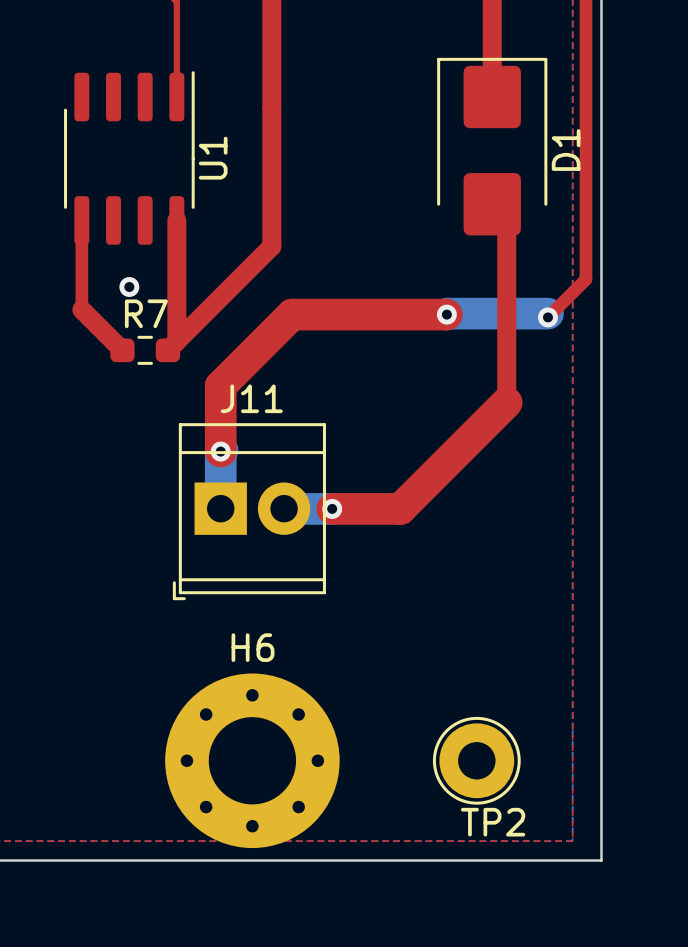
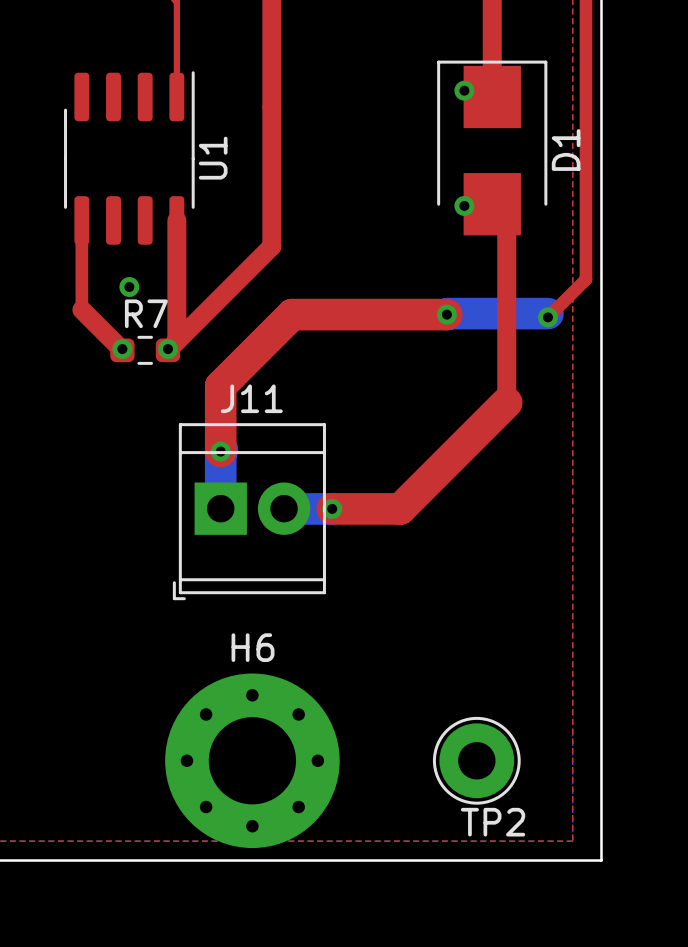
D1 footprint: [437, 57, 548, 236] -> [437, 60, 548, 236]
via: none -> (464, 90)
via: none -> (464, 205)
via: none -> (122, 349)
via: none -> (167, 349)

